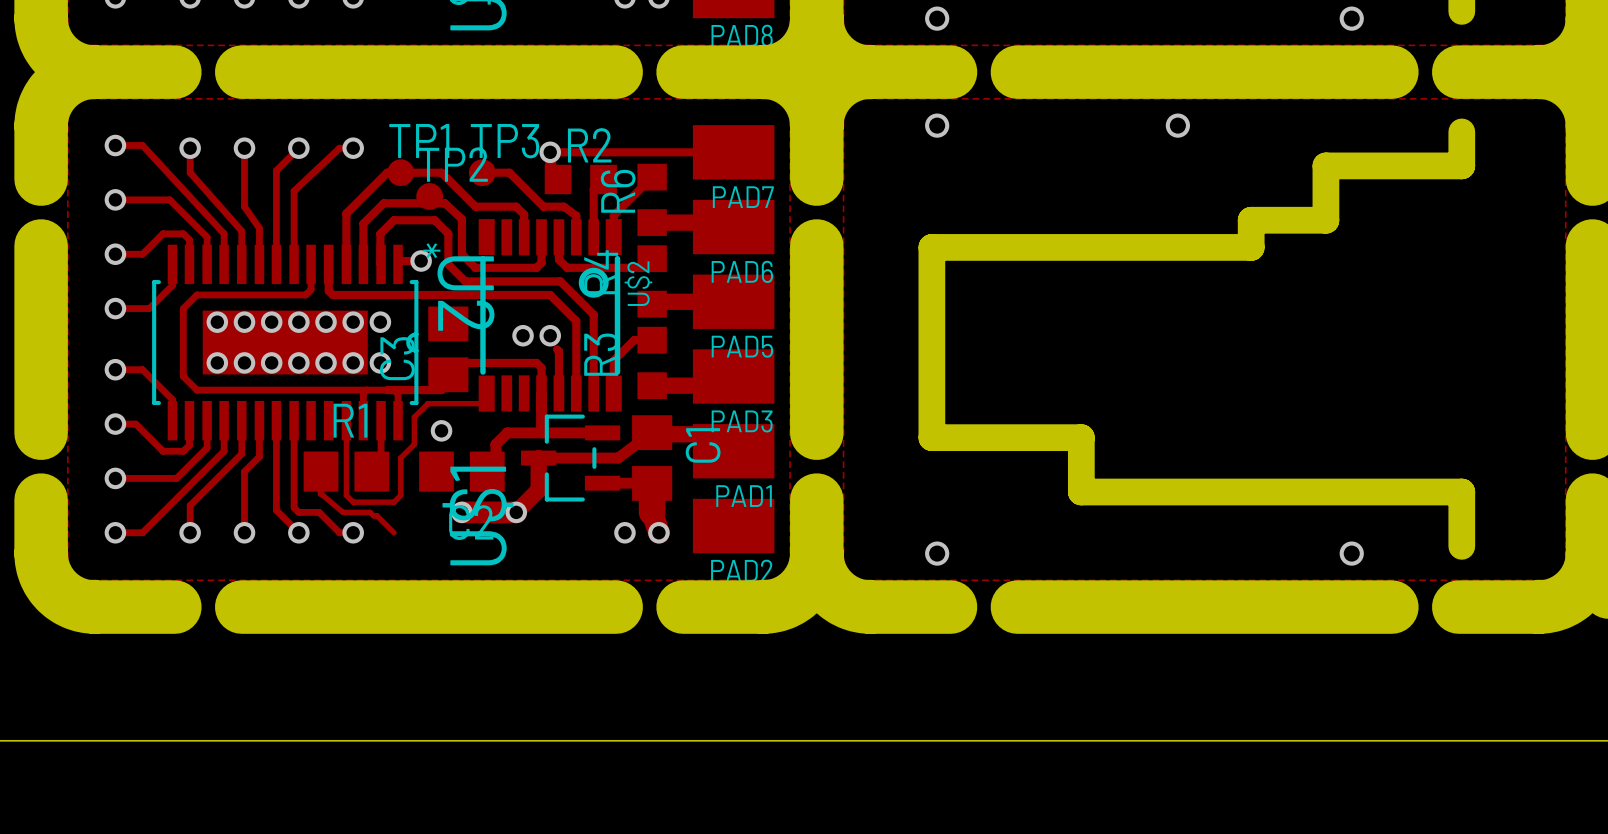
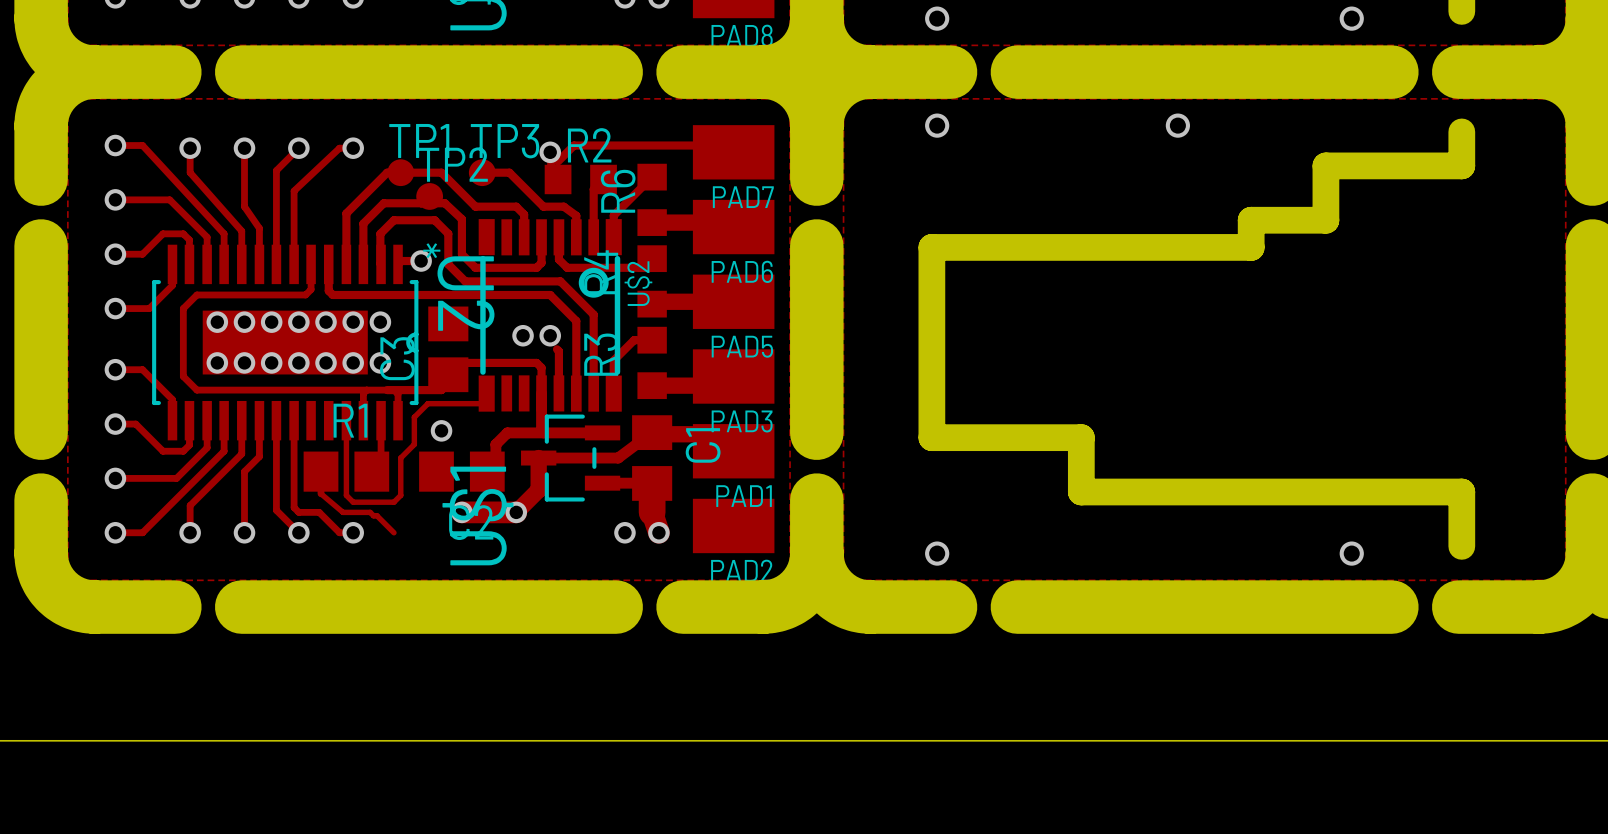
track: (733, 152) (550, 152) (551, 175) (558, 179) -> (733, 152) (720, 145) (574, 145) (558, 161)

